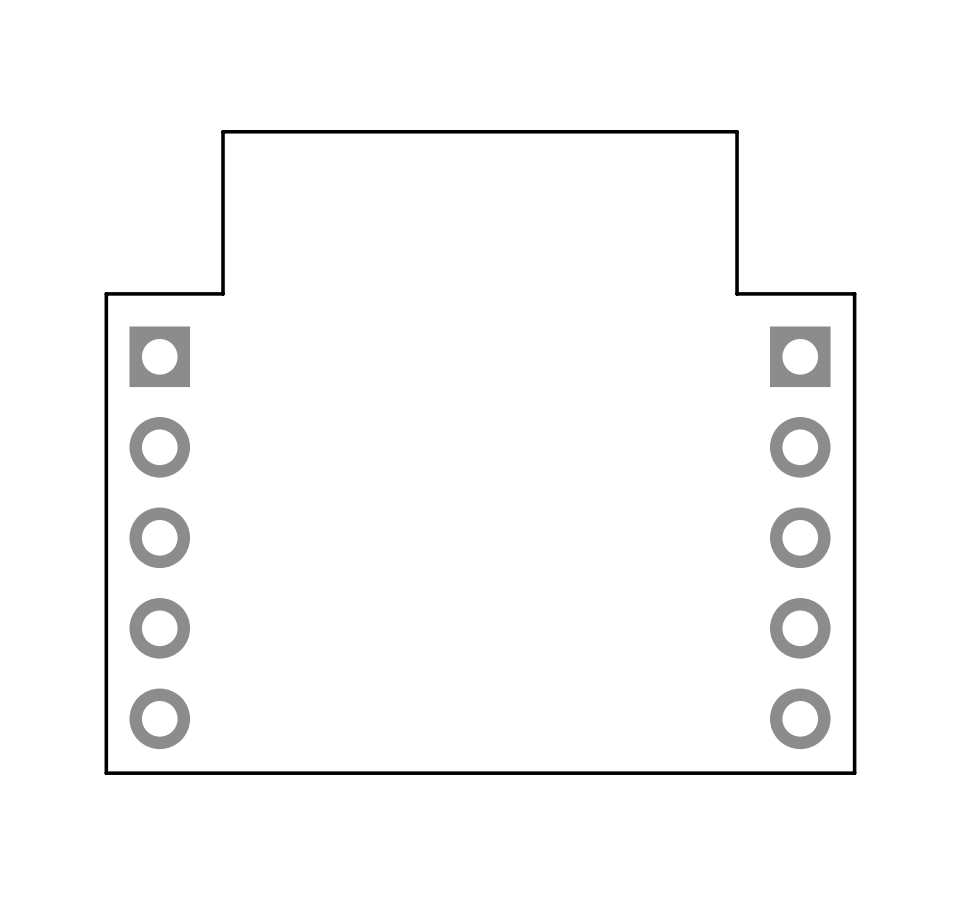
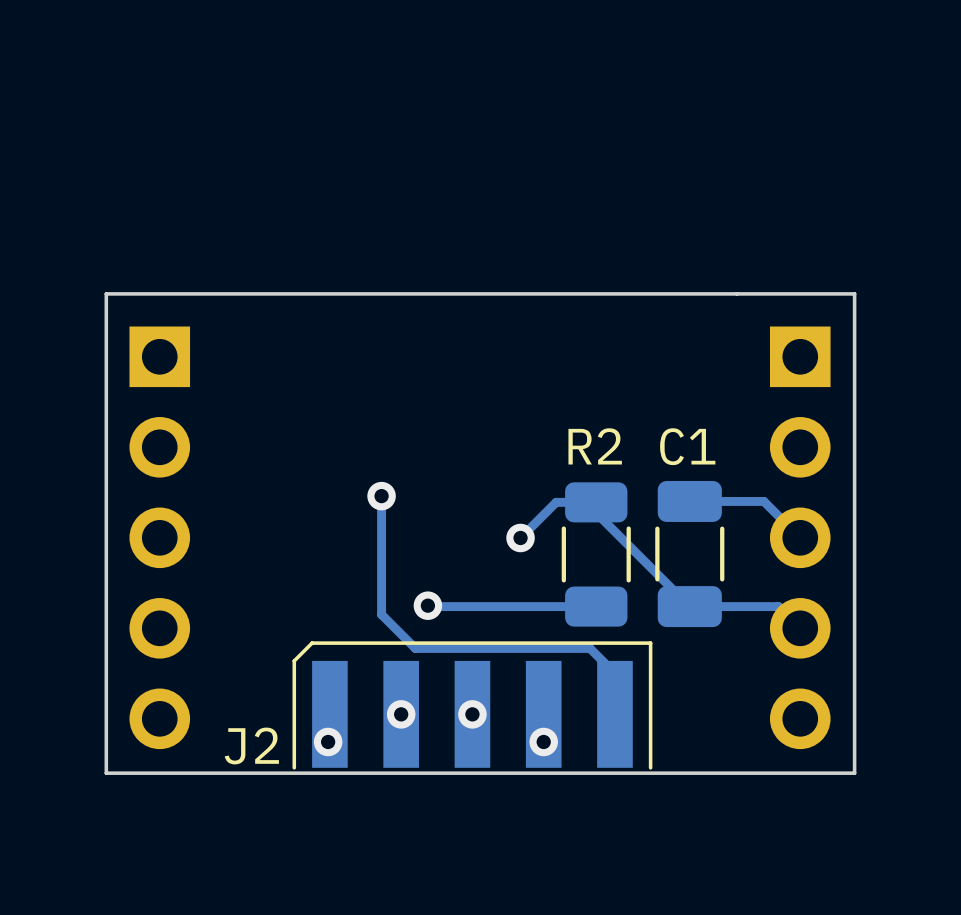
board edge: (737, 293) (737, 131) (223, 131) (223, 293) -> (737, 293) (223, 293)
track: none -> (381, 496) (381, 614) (415, 648) (590, 648) (614, 673) (614, 714)
via: none -> (381, 496)
track: none -> (689, 501) (763, 501) (800, 537)
track: none -> (520, 537) (556, 502) (596, 502) (596, 513) (689, 606) (778, 606) (800, 628)
via: none -> (520, 537)
R2: none -> (596, 554)
C1: none -> (689, 554)
track: none -> (427, 605) (596, 606)
via: none -> (427, 605)
J2: none -> (472, 705)
via: none -> (401, 714)
via: none -> (472, 714)
via: none -> (328, 741)
via: none -> (543, 741)

